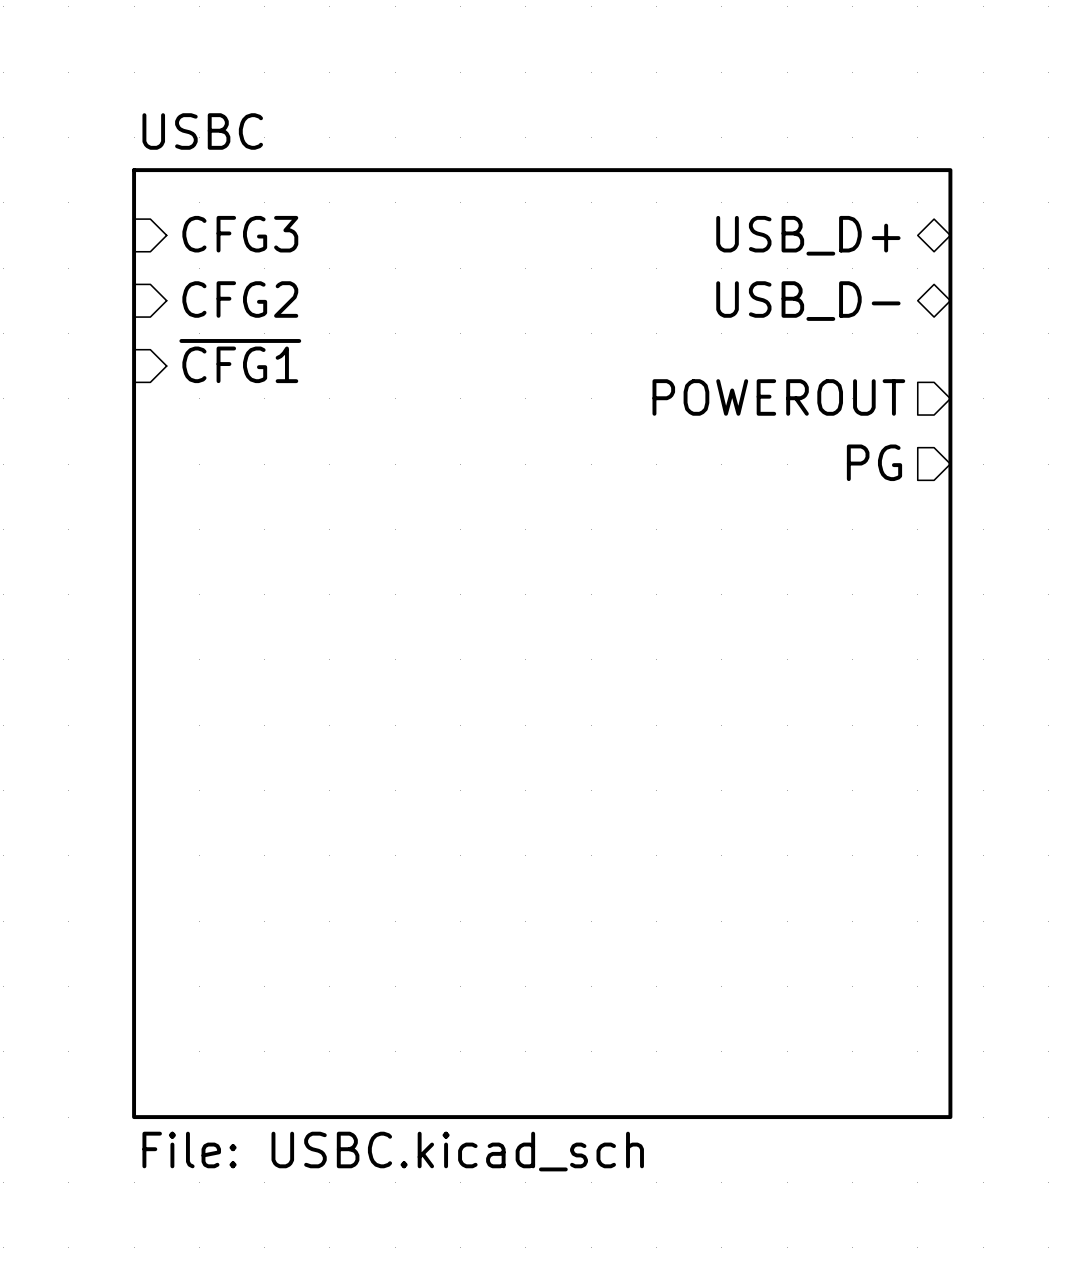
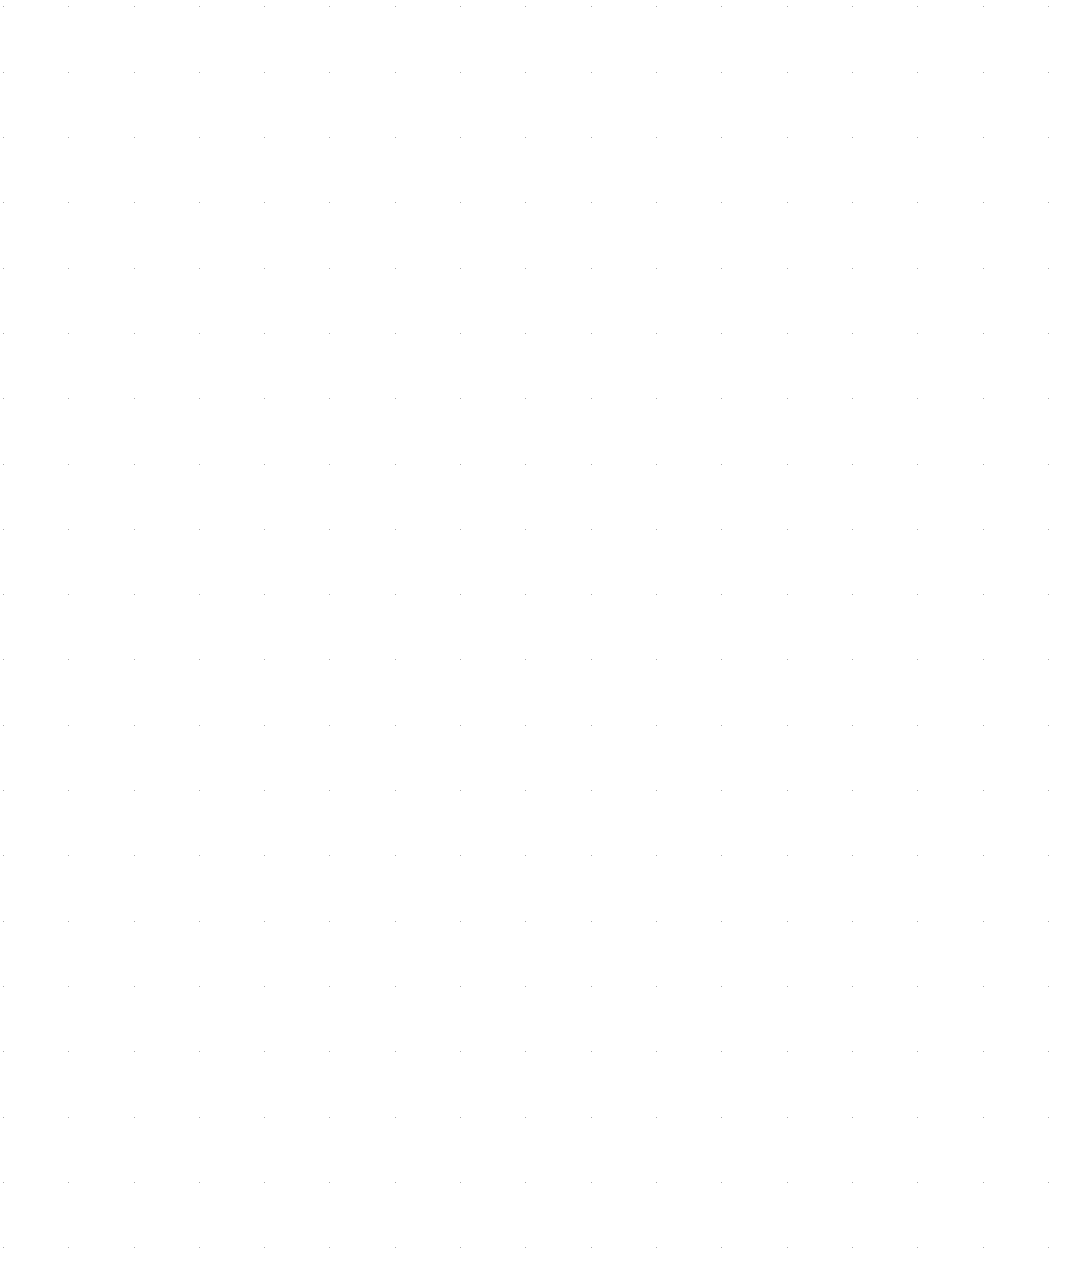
sheet pin: CFG3 (240, 234) -> none
sheet pin: USB_D+ (808, 235) -> none
sheet pin: CFG2 (240, 299) -> none
sheet pin: USB_D- (808, 301) -> none
sheet pin: ~{CFG1} (240, 361) -> none
sheet pin: POWEROUT (778, 397) -> none
sheet pin: PG (874, 462) -> none
sheet USBC: File: USBC.kicad_sch (542, 643) -> none

